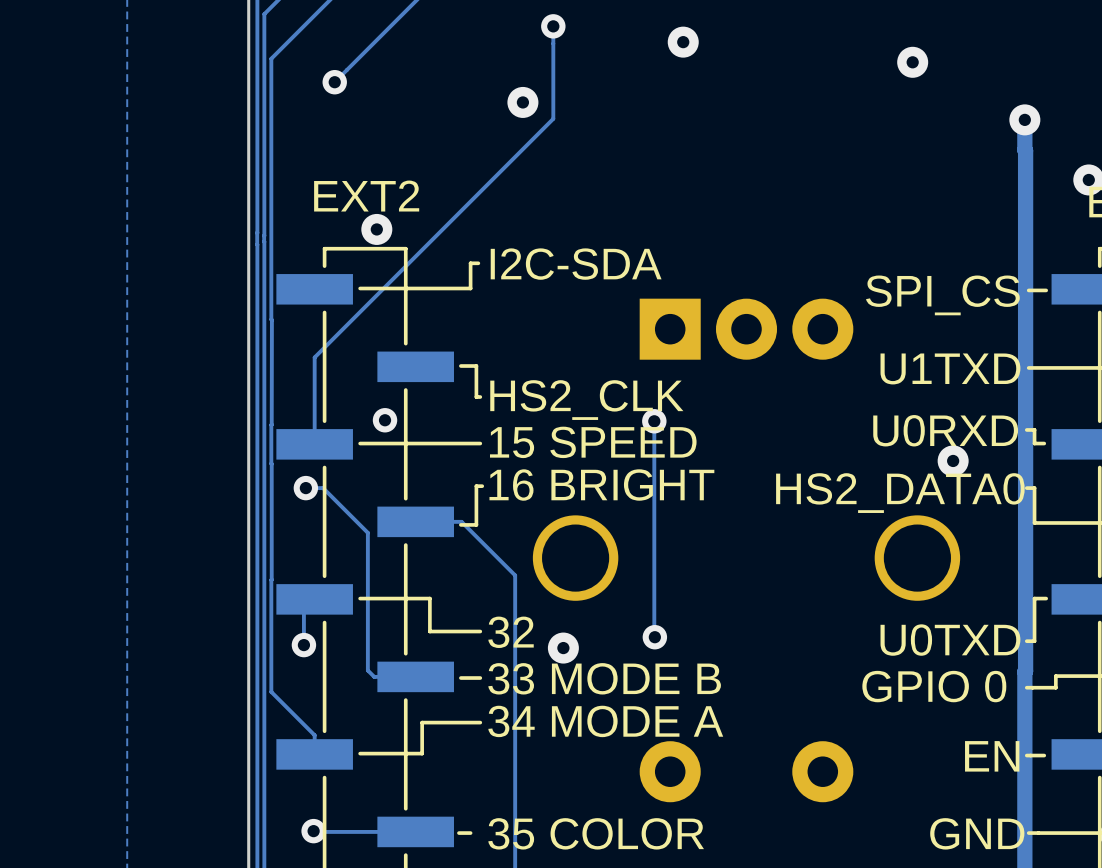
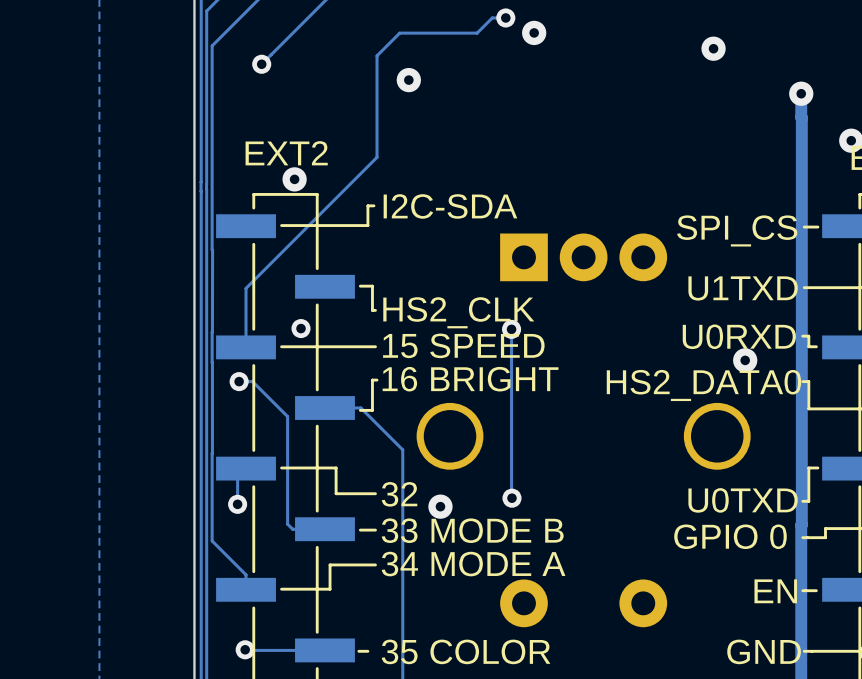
track: (553, 26) (553, 118) (314, 357) (314, 368) -> (505, 17) (492, 17) (477, 33) (399, 33) (377, 55) (377, 157) (246, 288)
via position: (553, 26) -> (505, 17)

